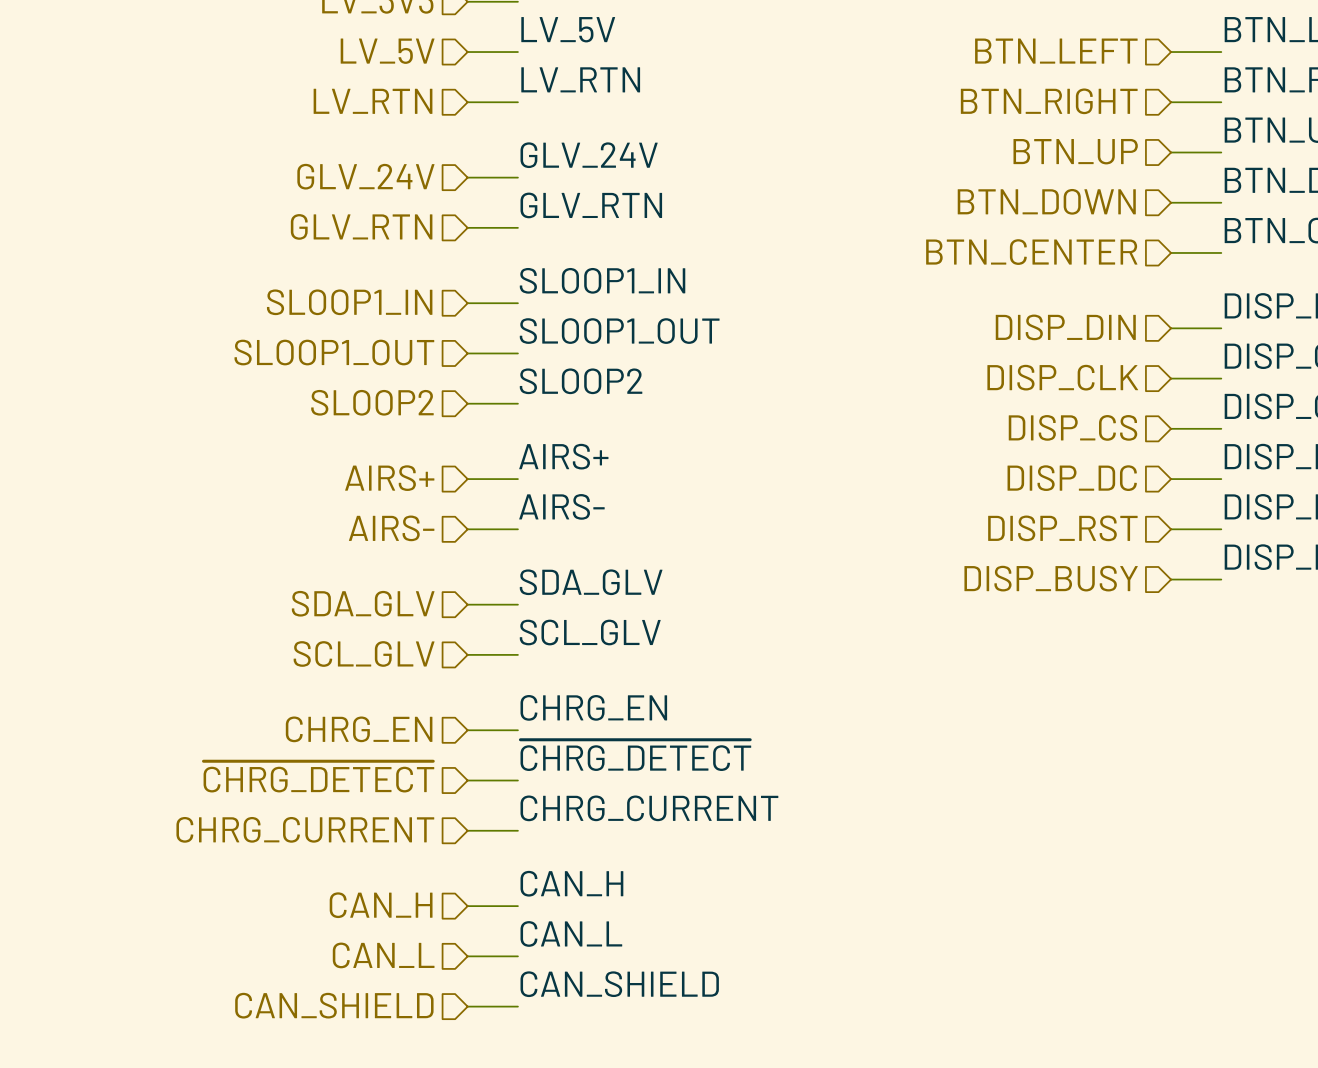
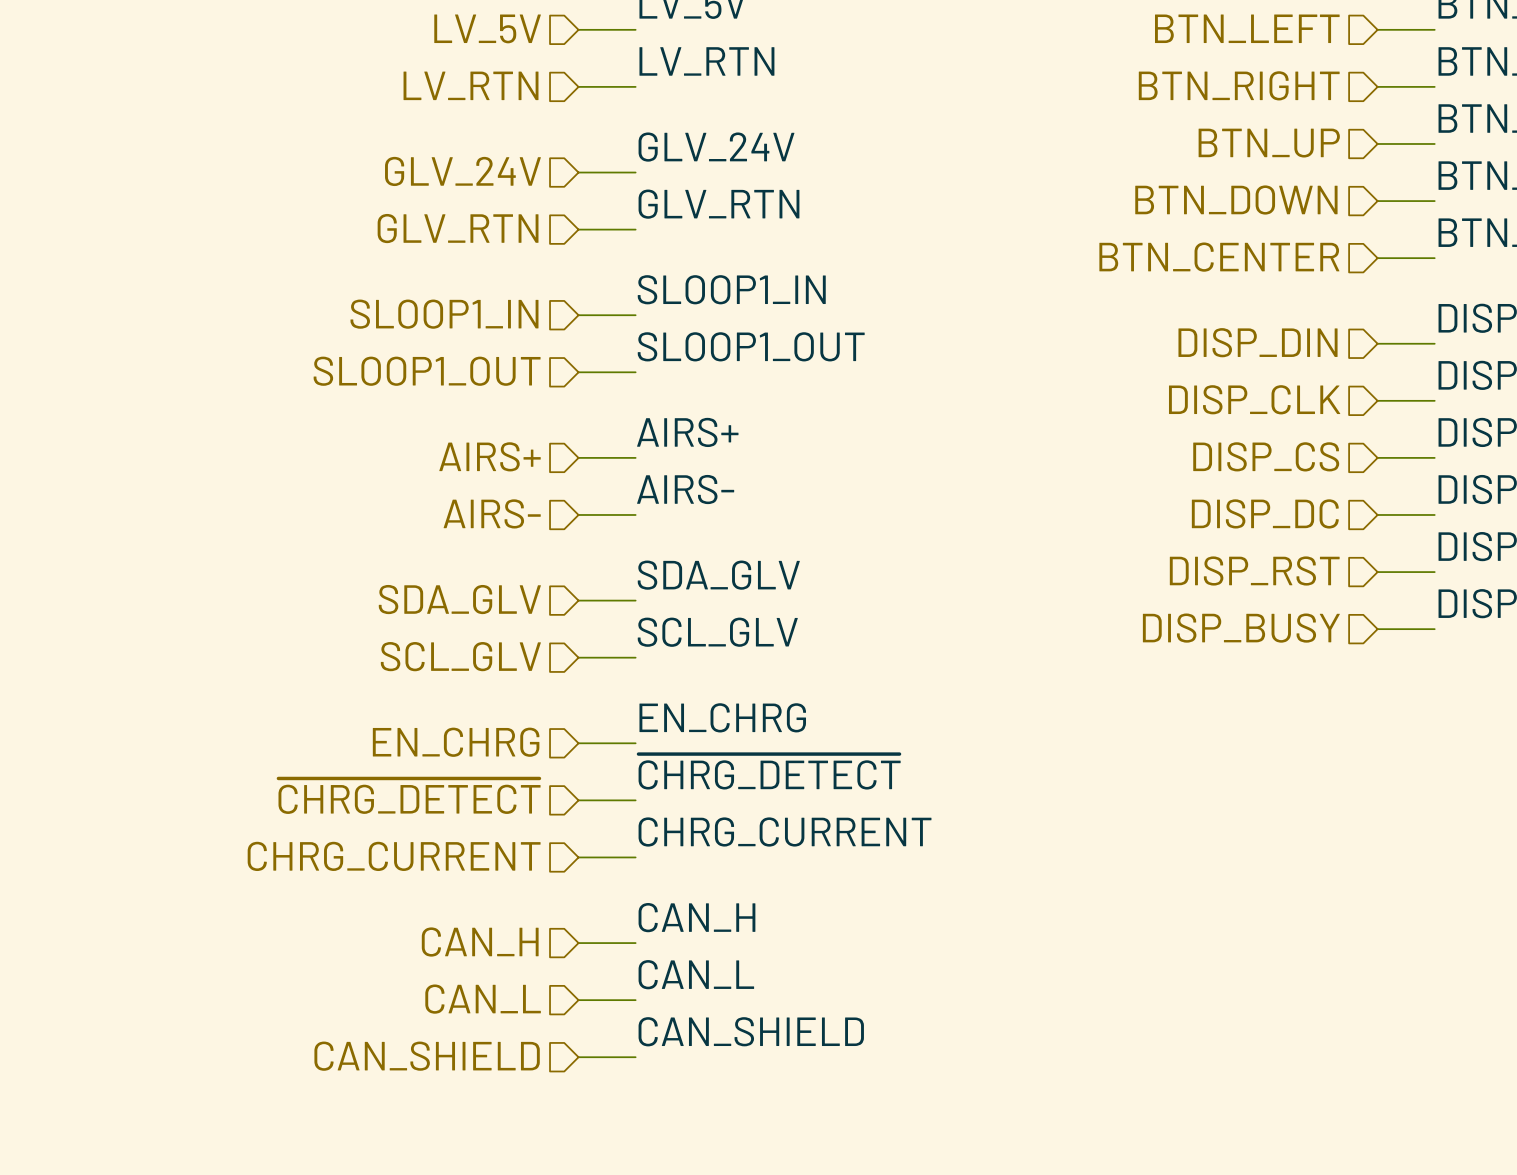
label: SLOOP2 (581, 381) -> none
hierarchical label: SLOOP2 (372, 402) -> none
wire: (467, 403) (517, 403) -> (578, 457) (635, 457)
label: none -> AIRS+ (687, 432)
hierarchical label: none -> AIRS+ (489, 456)
label: AIRS+ (563, 456) -> AIRS- (685, 489)
hierarchical label: AIRS+ (389, 478) -> AIRS- (492, 513)
label: AIRS- (561, 506) -> none
hierarchical label: AIRS- (391, 528) -> none
wire: (467, 529) (517, 529) -> (578, 600) (635, 600)
label: none -> SDA_GLV (718, 575)
hierarchical label: none -> SDA_GLV (459, 599)
label: SDA_GLV (591, 582) -> SCL_GLV (717, 632)
hierarchical label: SDA_GLV (363, 603) -> SCL_GLV (460, 656)
label: SCL_GLV (590, 632) -> none
hierarchical label: SCL_GLV (364, 653) -> none
wire: (467, 654) (517, 654) -> (578, 743) (635, 743)
label: none -> EN_CHRG (722, 717)
hierarchical label: none -> EN_CHRG (456, 742)
label: CHRG_EN (593, 707) -> ~{CHRG_DETECT} (769, 771)
hierarchical label: CHRG_EN (359, 729) -> ~{CHRG_DETECT} (409, 796)
label: ~{CHRG_DETECT} (635, 755) -> CHRG_CURRENT (785, 832)
hierarchical label: ~{CHRG_DETECT} (318, 776) -> CHRG_CURRENT (394, 856)
label: CHRG_CURRENT (649, 808) -> none
hierarchical label: CHRG_CURRENT (305, 829) -> none
wire: (467, 830) (517, 830) -> (578, 943) (635, 943)
label: none -> CAN_H (696, 917)
hierarchical label: none -> CAN_H (480, 942)
label: CAN_H (571, 883) -> CAN_L (696, 974)
hierarchical label: CAN_H (381, 905) -> CAN_L (483, 999)
label: CAN_L (571, 933) -> CAN_SHIELD (751, 1031)
hierarchical label: CAN_L (383, 955) -> CAN_SHIELD (427, 1056)
label: CAN_SHIELD (619, 984) -> none
hierarchical label: CAN_SHIELD (334, 1005) -> none
wire: (467, 1006) (517, 1006) -> none

